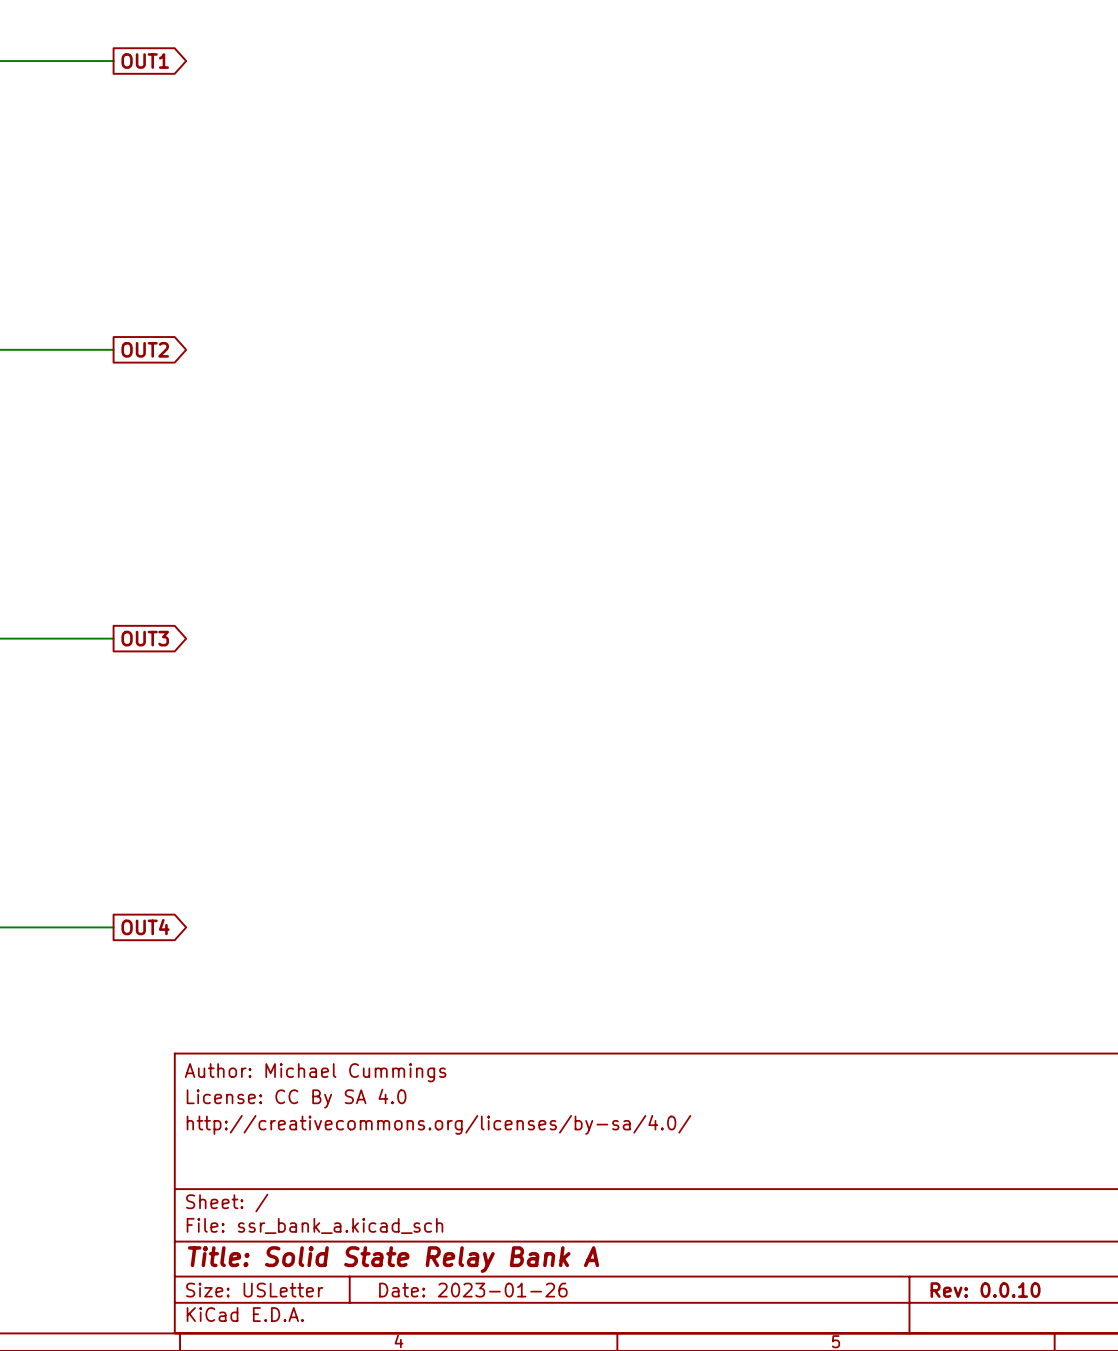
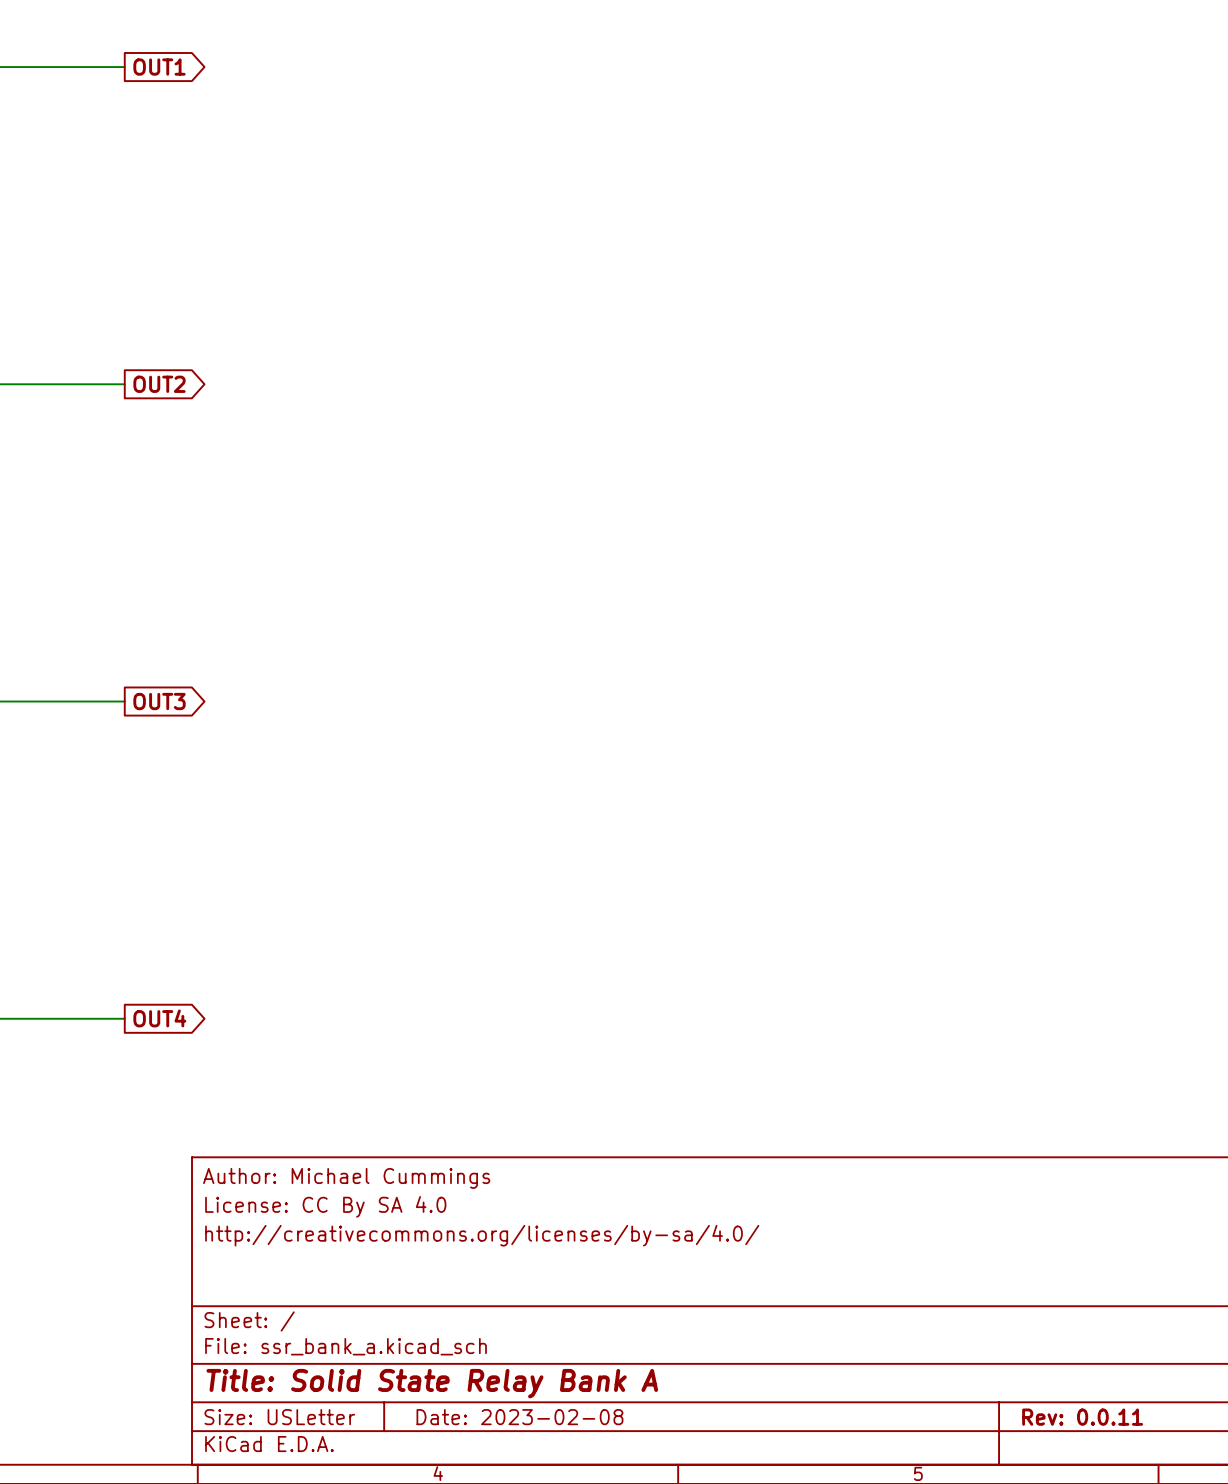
title block: Date: 2023-01-26 (473, 1290) -> Date: 2023-02-08 (519, 1417)
title block: Rev: 0.0.10 (985, 1290) -> Rev: 0.0.11 (1082, 1417)

